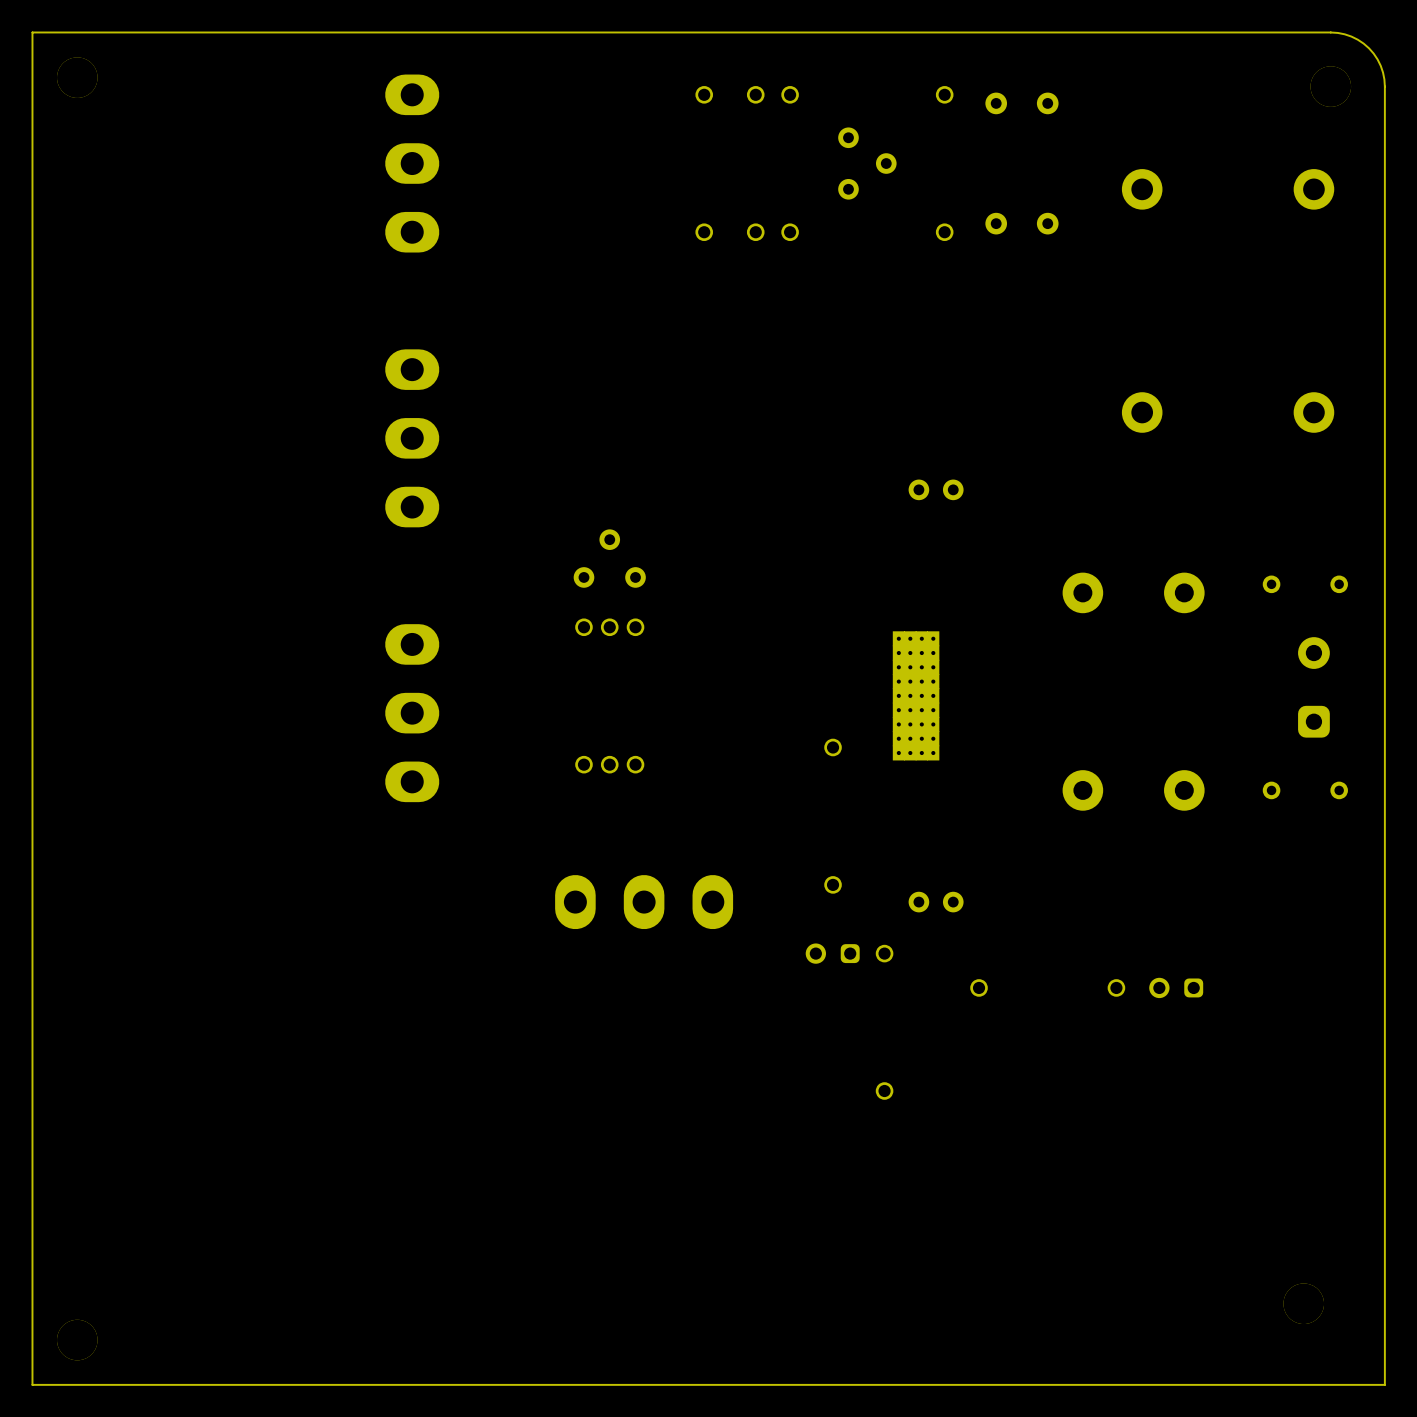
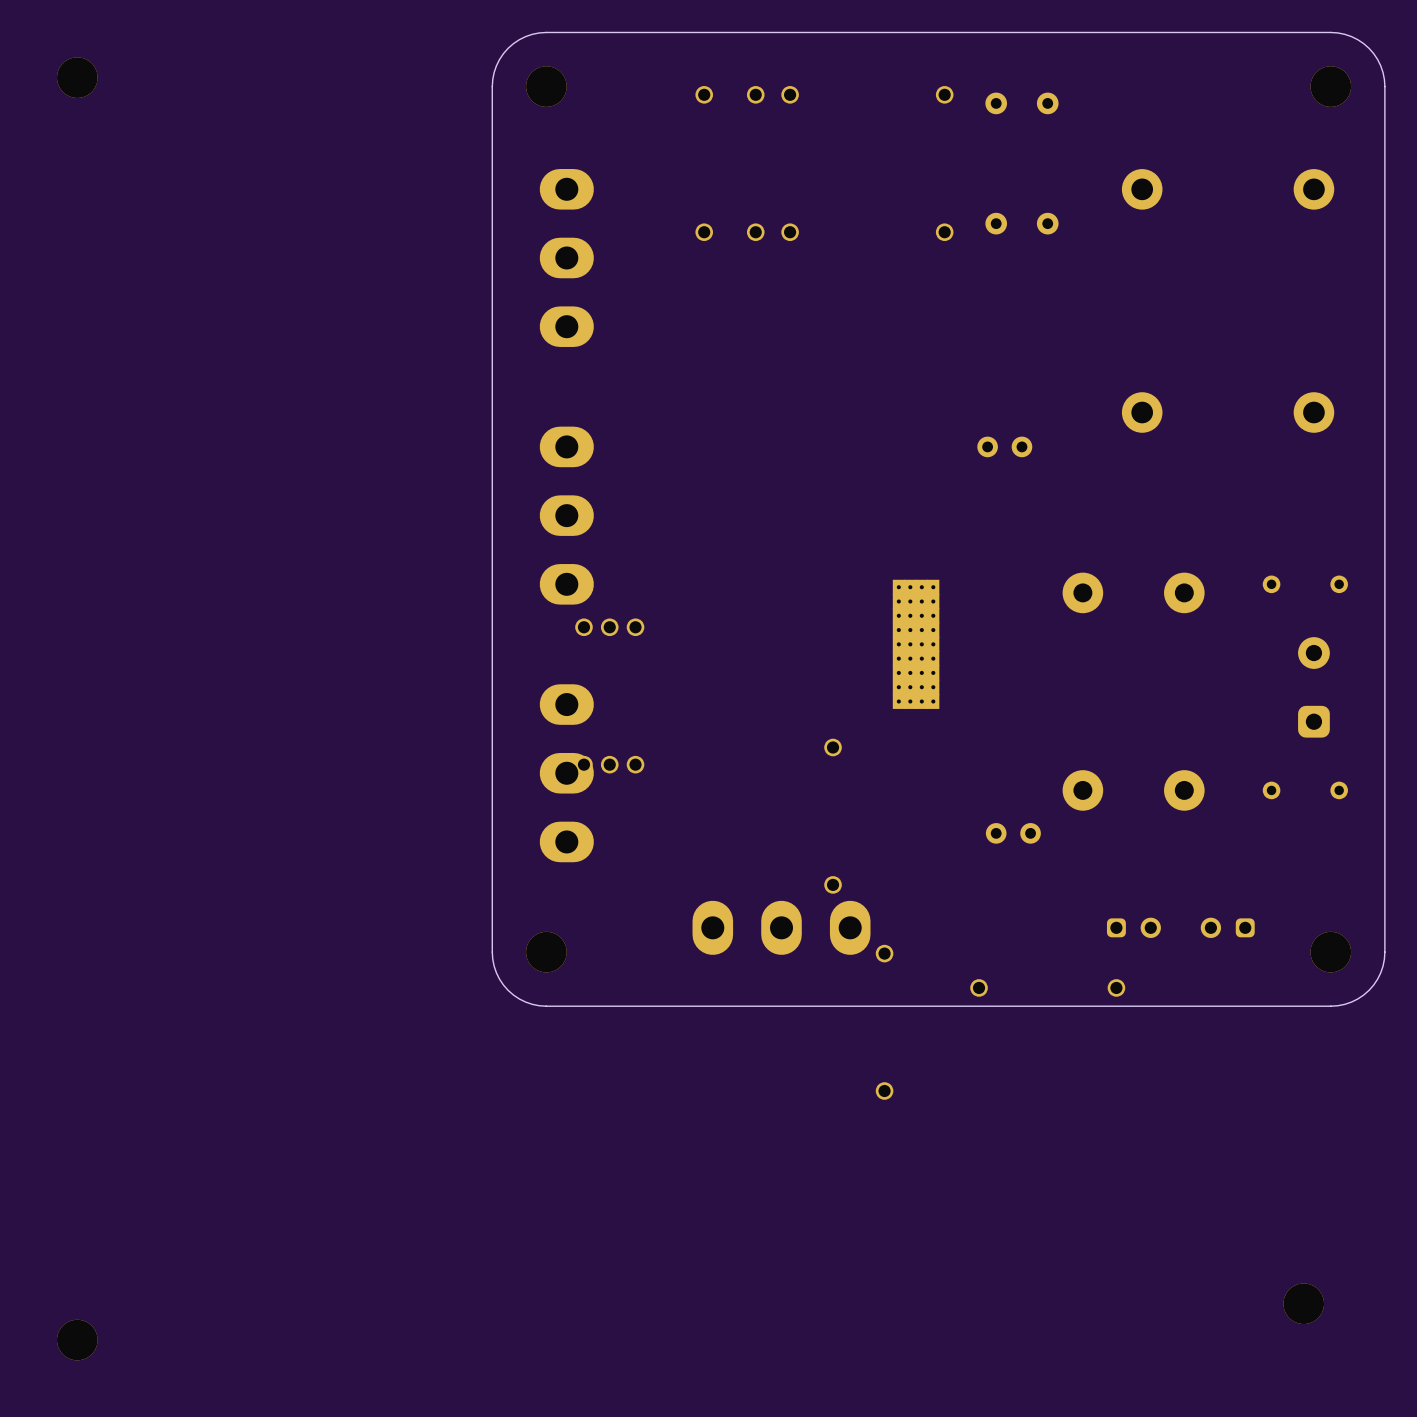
board edge: (546, 32) (32, 32) (32, 1384) (1384, 1384) (1384, 952) -> (546, 32) (525, 36) (508, 48) (496, 65) (492, 86) (492, 952) (496, 972) (508, 990) (525, 1002) (546, 1006) (1330, 1006) (1351, 1002) (1369, 990) (1380, 972) (1384, 952)
part: none -> (546, 86)
part: (412, 163) -> none
part: (867, 163) -> none
part: none -> (566, 257)
part: (412, 438) -> none
part position: (936, 489) -> (1004, 446)
part: none -> (566, 515)
part: (609, 558) -> none
part position: (916, 695) -> (916, 644)
part: (412, 713) -> none
part: none -> (566, 773)
part: (644, 902) -> none
part position: (936, 902) -> (1013, 833)
part: none -> (781, 927)
part: none -> (1133, 927)
part: none -> (1227, 927)
part: none -> (546, 952)
part: none -> (1330, 952)
part: (832, 953) -> none
part: (1176, 987) -> none

